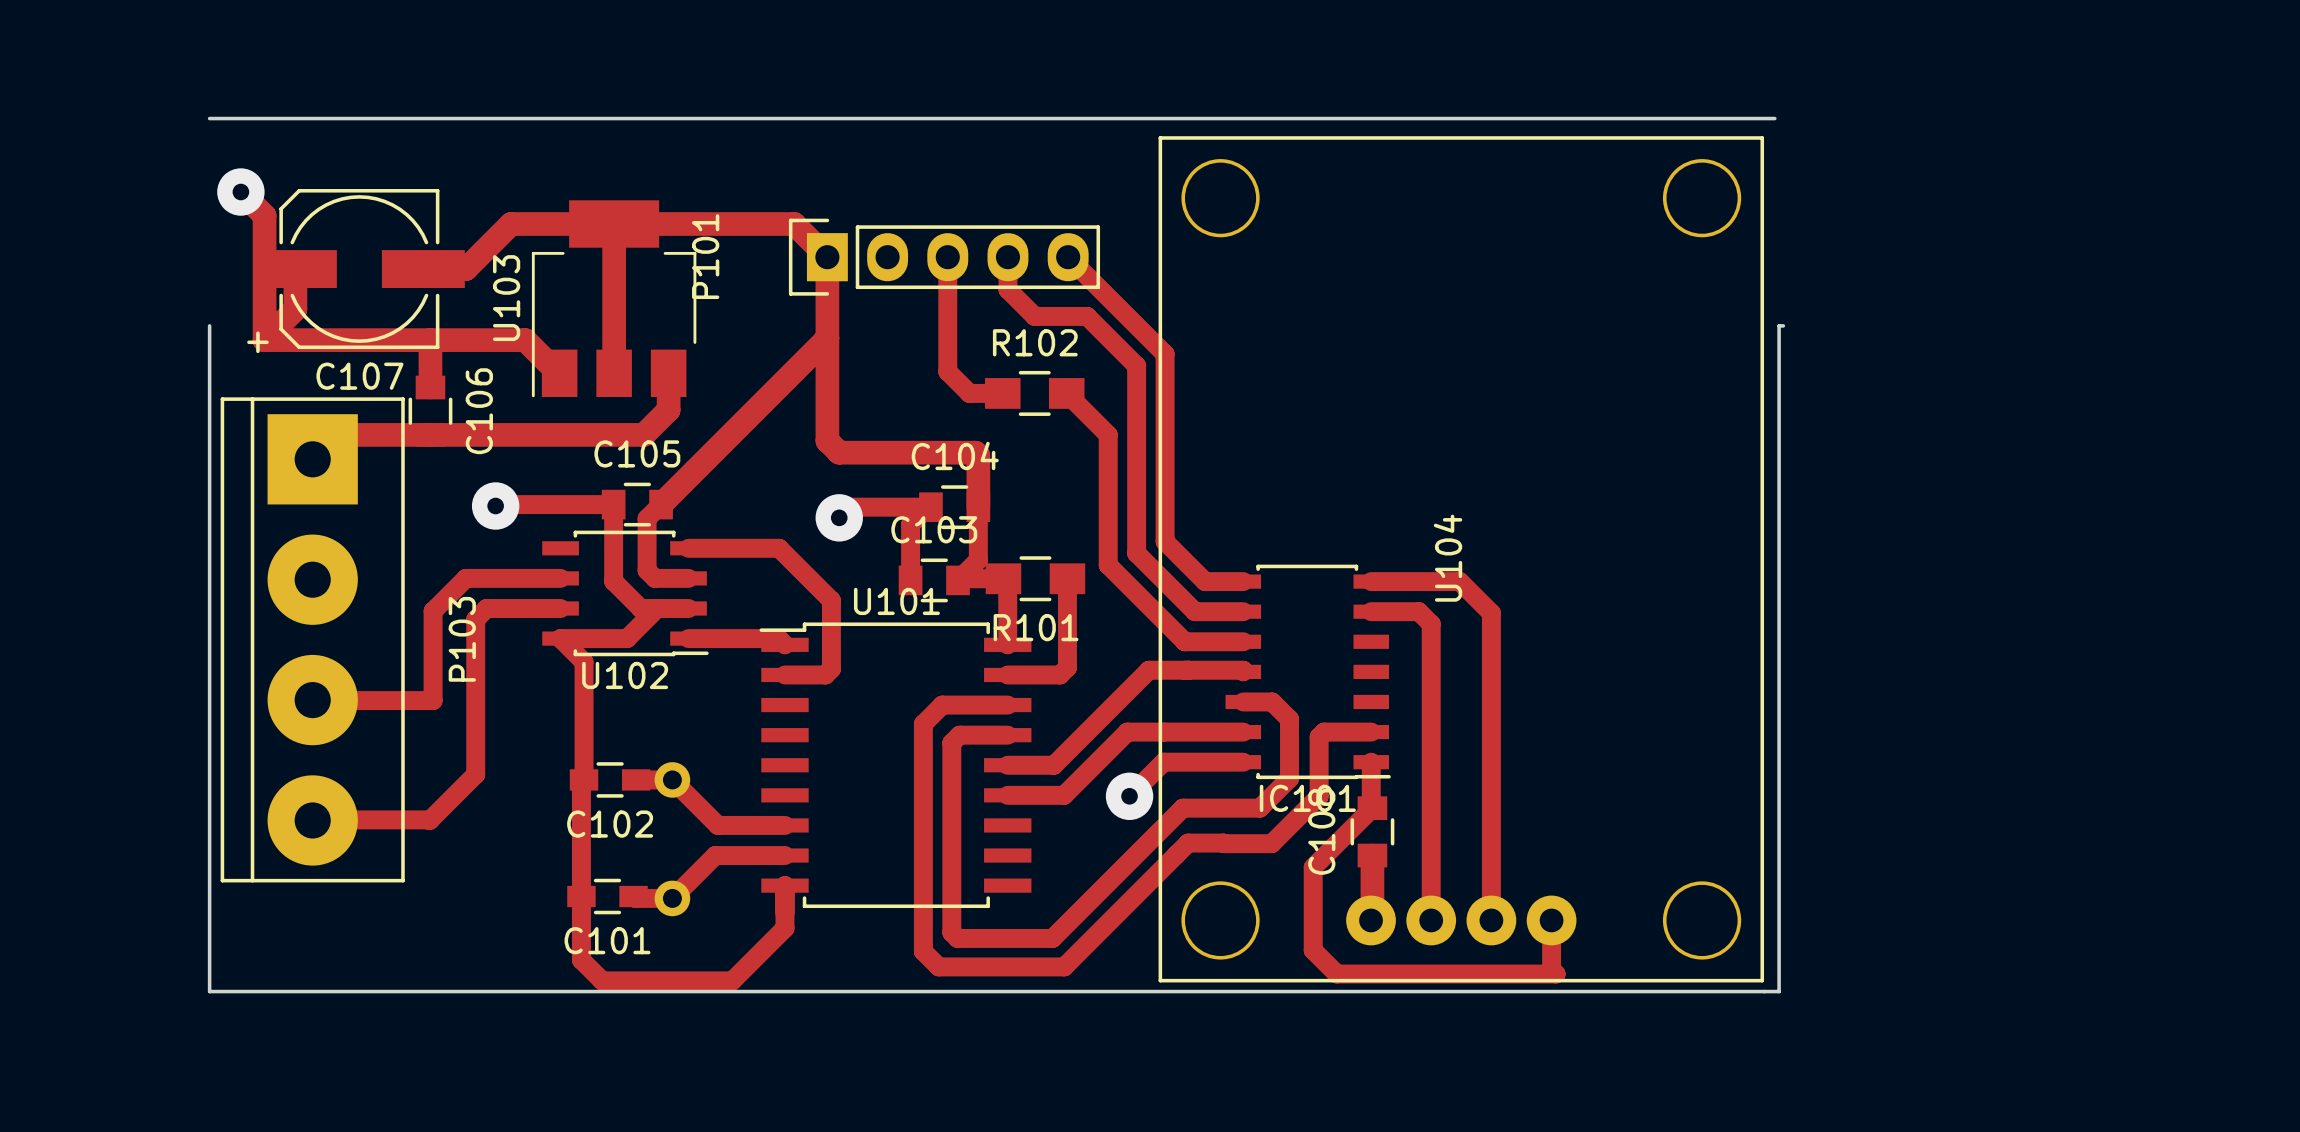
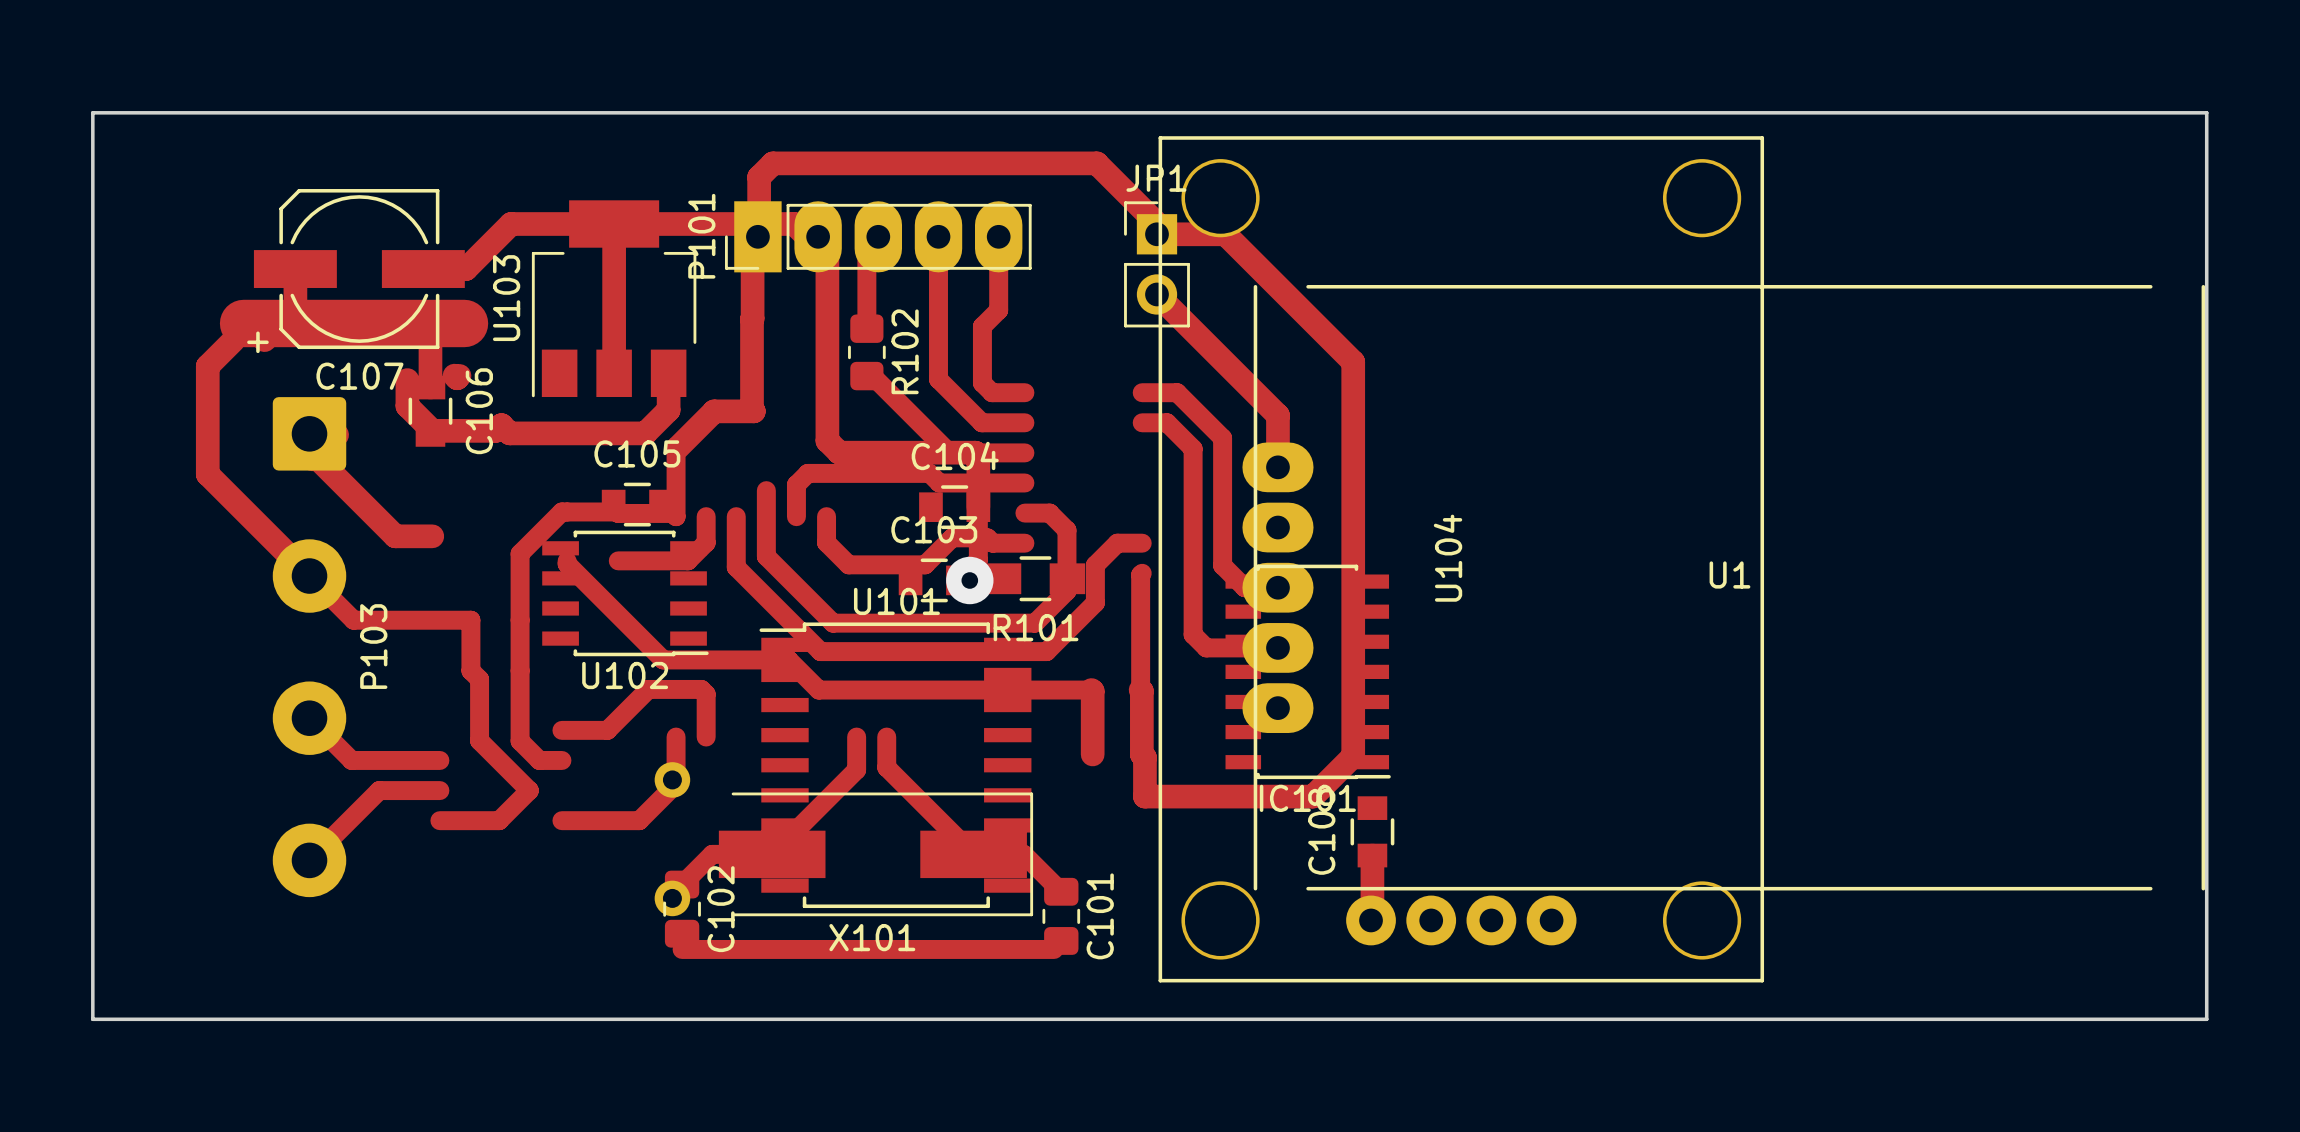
board edge: none -> (92, 112) (2206, 112) (2206, 1019) (92, 1019) (92, 112)
board edge: (209, 118) (1774, 118) -> none
track: (240, 192) (264, 215) (264, 340) (525, 340) (558, 373) -> none
via: (240, 192) -> none
P101 footprint: [788, 218, 1101, 296] -> [724, 201, 1032, 273]
track: none -> (878, 236) (866, 248) (866, 328)
track: none -> (938, 236) (938, 379) (981, 422) (1024, 422)
track: none -> (998, 236) (998, 310) (982, 326) (982, 383) (992, 392) (1024, 392)
P101 name position: P101 (705, 256) -> P101 (701, 236)
track: (947, 257) (947, 371) (969, 393) (1002, 393) -> none
track: (1007, 257) (1007, 289) (1034, 316) (1087, 316) (1136, 365) (1136, 553) (1195, 611) (1243, 611) -> none
track: (1068, 257) (1165, 354) (1165, 541) (1205, 581) (1243, 581) -> none
JP1: none -> (1156, 264)
track: none -> (1156, 294) (1277, 415) (1277, 467)
track: none -> (243, 323) (464, 323)
board edge: (209, 325) (209, 991) (1779, 991) (1779, 325) (1783, 325) -> none
track: (827, 338) (647, 518) (647, 570) (655, 578) (688, 578) -> none
track: none -> (233, 340) (207, 366) (207, 474) (353, 620) (470, 620) (470, 670) (479, 679) (479, 740) (529, 790) (499, 820) (439, 820)
R102 name position: R102 (1035, 342) -> R102 (905, 351)
R102 footprint: [984, 370, 1085, 416] -> [848, 314, 886, 391]
track: none -> (454, 375) (457, 378) (459, 375)
track: none -> (866, 376) (872, 376) (949, 452) (1024, 452)
track: none -> (1142, 392) (1177, 392) (1222, 438) (1222, 565) (1244, 587) (1277, 587)
track: (1066, 393) (1108, 434) (1108, 565) (1184, 641) (1243, 641) -> none
P103 footprint: [220, 397, 405, 883] -> [272, 397, 347, 898]
track: none -> (1142, 422) (1167, 422) (1193, 448) (1193, 634) (1206, 647) (1277, 647)
track: none -> (309, 433) (309, 450) (395, 536) (432, 536)
track: (645, 433) (643, 434) (337, 434) -> (645, 433) (509, 433) (501, 425) (495, 430) (432, 430) (407, 405) (407, 380)
track: none -> (676, 446) (676, 516) (672, 513) (561, 511) (520, 553) (520, 741) (539, 760) (561, 760)
track: none -> (677, 447) (714, 411) (753, 411) (752, 409) (752, 242) (759, 235) (759, 177) (772, 163) (1096, 163) (1156, 223) (1156, 234) (1225, 234) (1353, 362) (1353, 756) (1312, 796) (1144, 796) (1144, 757) (1141, 754) (1140, 690) (1140, 574) (1142, 573)
track: none -> (1024, 482) (939, 482) (929, 473) (807, 473) (796, 484) (796, 516)
track: none -> (766, 490) (766, 556) (833, 623) (1034, 623) (1066, 591) (1066, 530) (1049, 513) (1024, 513)
track: (495, 506) (613, 504) (613, 581) (640, 608) (688, 608) -> none
via: (495, 506) -> none
track: (927, 507) (910, 524) (910, 580) -> none
track: (930, 507) (849, 507) (839, 517) -> none
track: none -> (706, 516) (706, 542) (687, 560) (618, 560)
track: none -> (736, 516) (736, 567) (820, 651) (1046, 651) (1095, 602) (1095, 565) (1117, 543) (1142, 543)
track: none -> (826, 516) (826, 542) (848, 564) (925, 564) (952, 537) (987, 537) (992, 543) (1024, 543)
via: (839, 517) -> none
track: (688, 548) (779, 548) (831, 600) (831, 669) (825, 674) (784, 674) -> none
track: none -> (567, 561) (567, 563) (663, 659) (788, 659) (818, 690) (1091, 690) (1092, 754)
track: (560, 578) (465, 578) (433, 611) (433, 700) (312, 700) -> none
track: (959, 578) (1003, 578) (1007, 583) (1007, 644) -> none
track: (1067, 578) (1067, 667) (1060, 674) (1007, 674) -> none
via: none -> (969, 580)
track: (1371, 581) (1459, 581) (1491, 613) (1491, 920) -> none
U1: none -> (1723, 587)
track: (560, 608) (486, 608) (475, 619) (475, 774) (429, 820) -> none
track: (657, 608) (627, 638) (560, 638) (584, 662) (584, 779) (581, 782) (581, 960) (602, 980) (732, 980) (784, 928) (784, 885) -> none
track: (1371, 611) (1418, 611) (1431, 624) (1431, 920) -> none
track: (688, 638) (778, 638) (784, 644) -> none
P103 name position: P103 (462, 639) -> P103 (373, 646)
track: (1243, 671) (1243, 670) (1148, 670) (1053, 765) (1007, 765) -> none
track: (1243, 701) (1272, 701) (1289, 719) (1289, 778) (1259, 808) (1182, 808) (1052, 938) (957, 938) (951, 932) (951, 742) (959, 735) (1007, 735) -> none
track: (1007, 705) (942, 705) (923, 724) (923, 951) (938, 966) (1064, 966) (1188, 843) (1271, 843) (1319, 796) (1319, 737) (1324, 732) (1371, 732) -> none
track: none -> (309, 718) (351, 760) (439, 760)
track: none -> (561, 730) (607, 730) (648, 689) (701, 689) (706, 694) (706, 737)
track: (1243, 732) (1127, 732) (1064, 795) (1007, 795) -> none
track: none -> (676, 737) (676, 783) (639, 820) (561, 820)
track: none -> (856, 737) (856, 769) (772, 854) (712, 854) (682, 884)
track: none -> (886, 737) (886, 767) (973, 854) (1023, 854) (1061, 891)
C102 footprint: [569, 762, 651, 798] -> [663, 870, 701, 948]
track: (1243, 762) (1163, 762) (1129, 796) -> none
track: (1371, 762) (1371, 809) (1313, 867) (1313, 950) (1336, 974) (1556, 974) (1551, 969) (1551, 920) -> none
track: (636, 779) (672, 779) (717, 825) (784, 825) -> none
track: none -> (439, 790) (379, 790) (309, 860)
via: (1129, 796) -> none
track: (430, 819) (312, 820) -> none
C102 name position: C102 (610, 824) -> C102 (721, 909)
X101: none -> (875, 854)
track: (784, 855) (715, 855) (672, 898) (635, 898) (633, 896) -> none
C101 footprint: [567, 878, 648, 915] -> [1042, 877, 1081, 955]
C101 name position: C101 (607, 940) -> C101 (1100, 916)
track: none -> (682, 949) (1054, 949)

